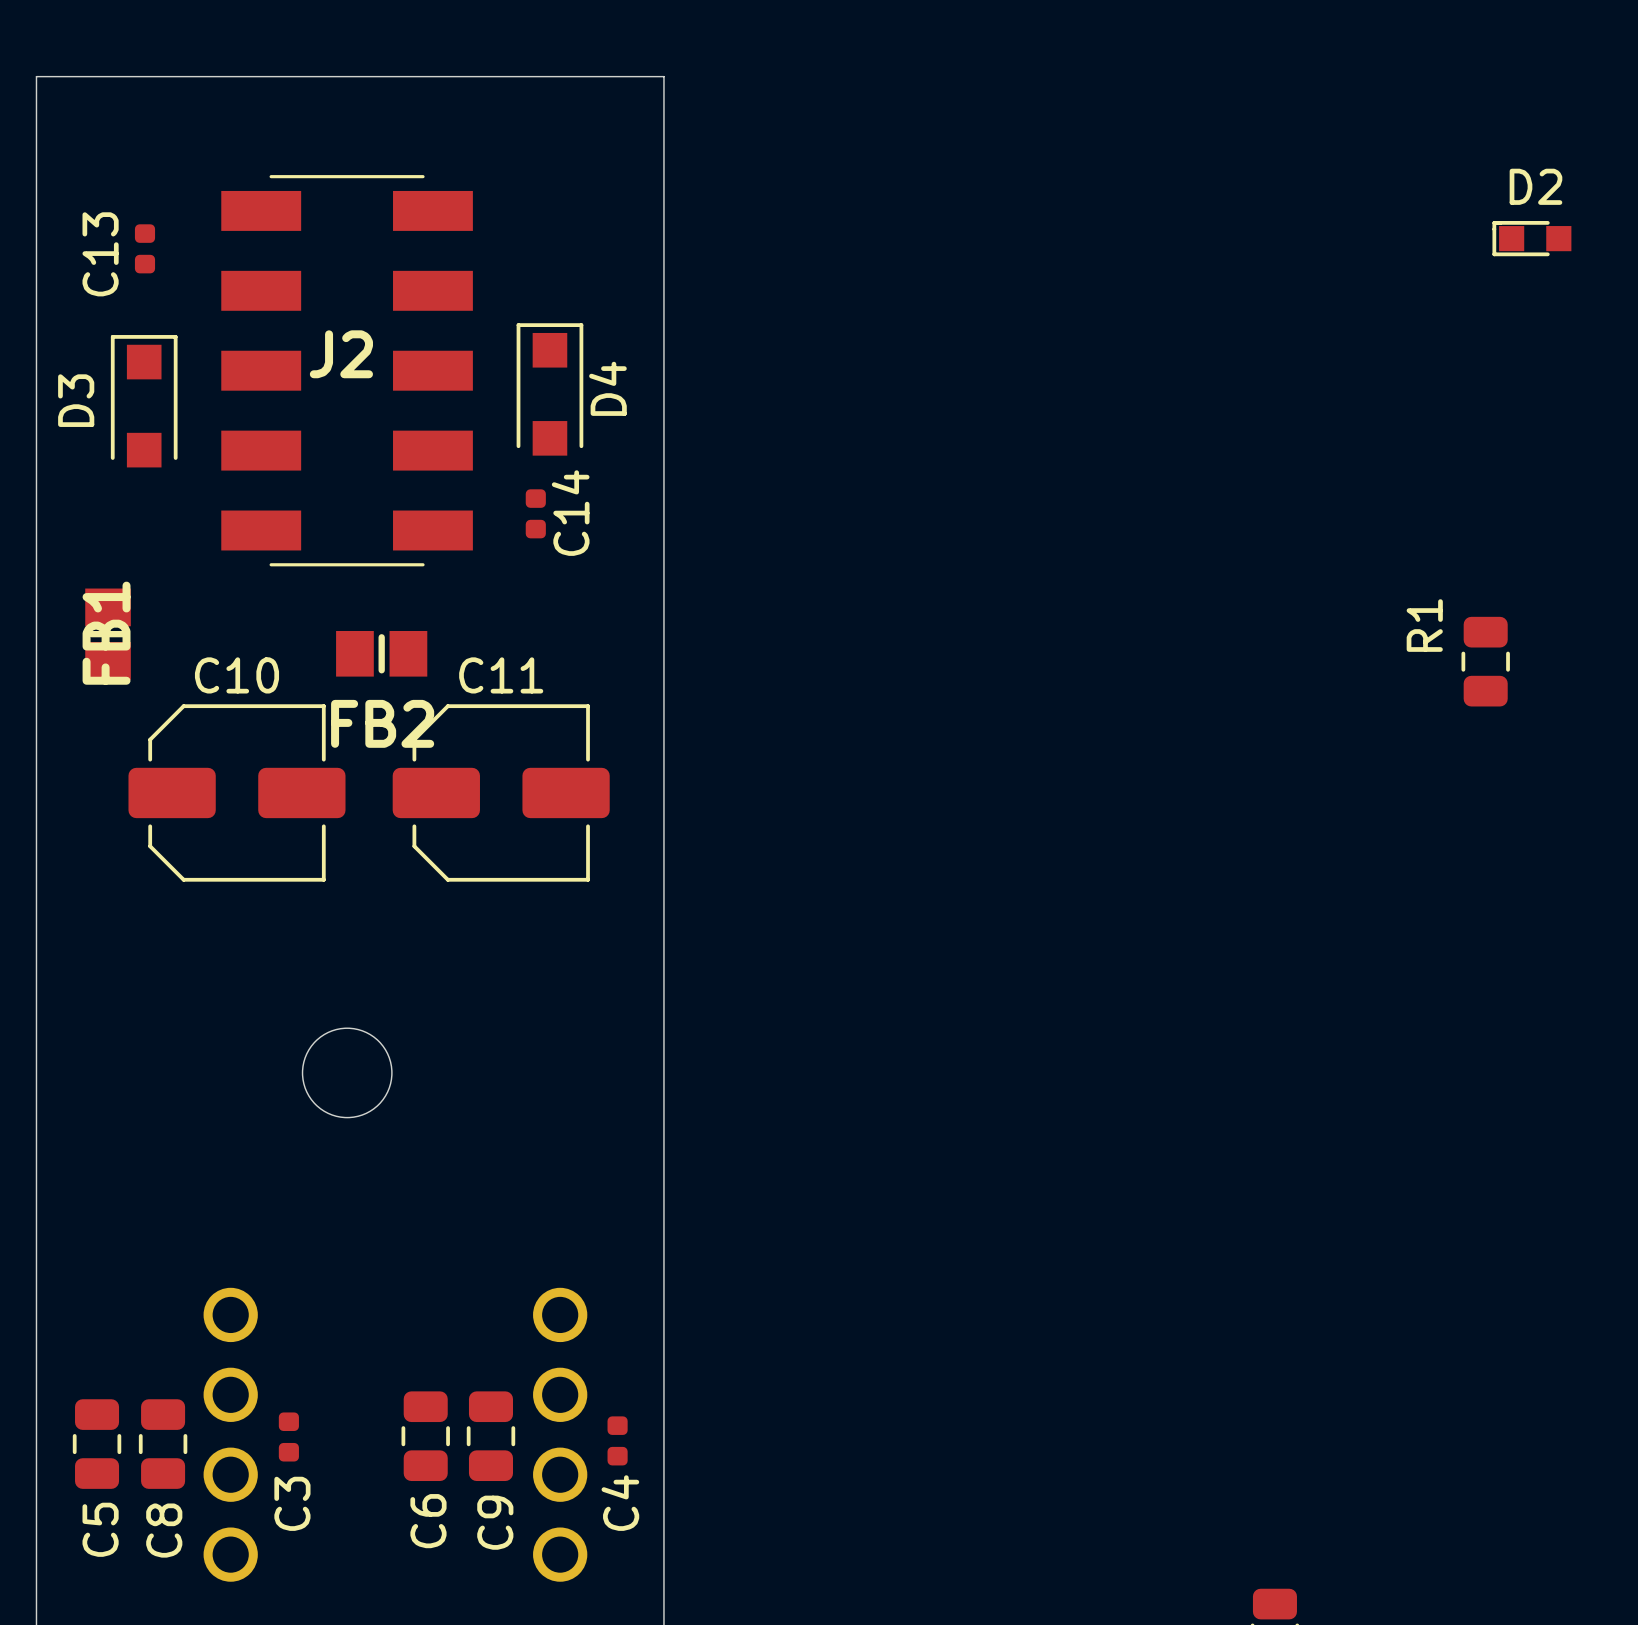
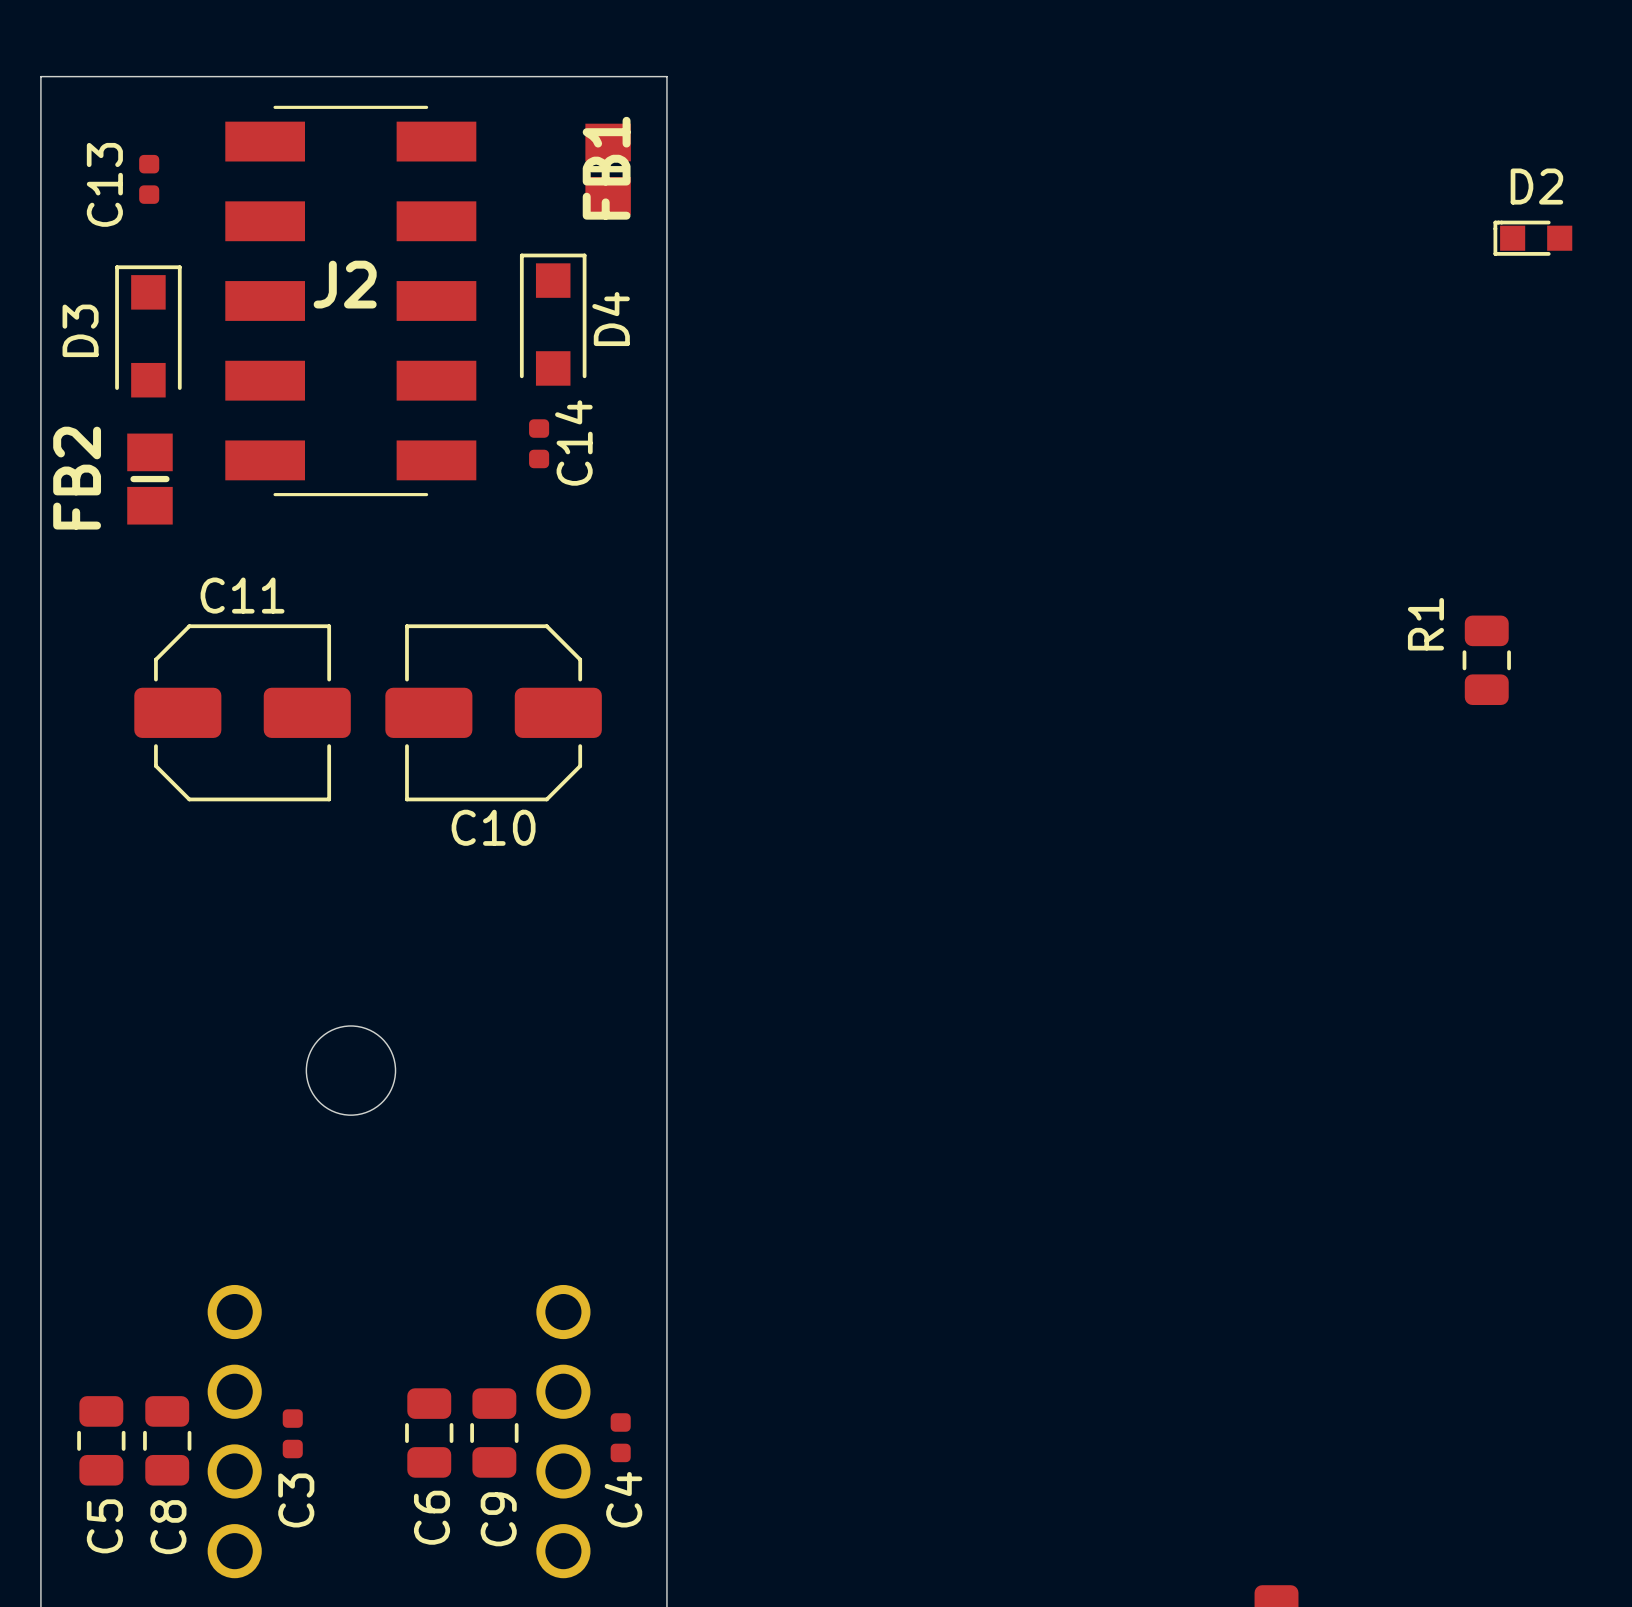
C13 position: (144, 248) -> (149, 179)
J2 position: (347, 370) -> (350, 300)
D4 position: (549, 389) -> (553, 319)
D3 position: (144, 401) -> (148, 331)
C14 position: (535, 513) -> (539, 443)
FB1 position: (108, 634) -> (608, 169)
FB2 rotation: 0° (381, 653) -> 90° clockwise (149, 479)
FB2 position: (381, 653) -> (149, 479)
C10 rotation: 0° (236, 792) -> 180° (493, 712)
C10 position: (236, 792) -> (493, 712)
C11 position: (501, 792) -> (242, 712)

